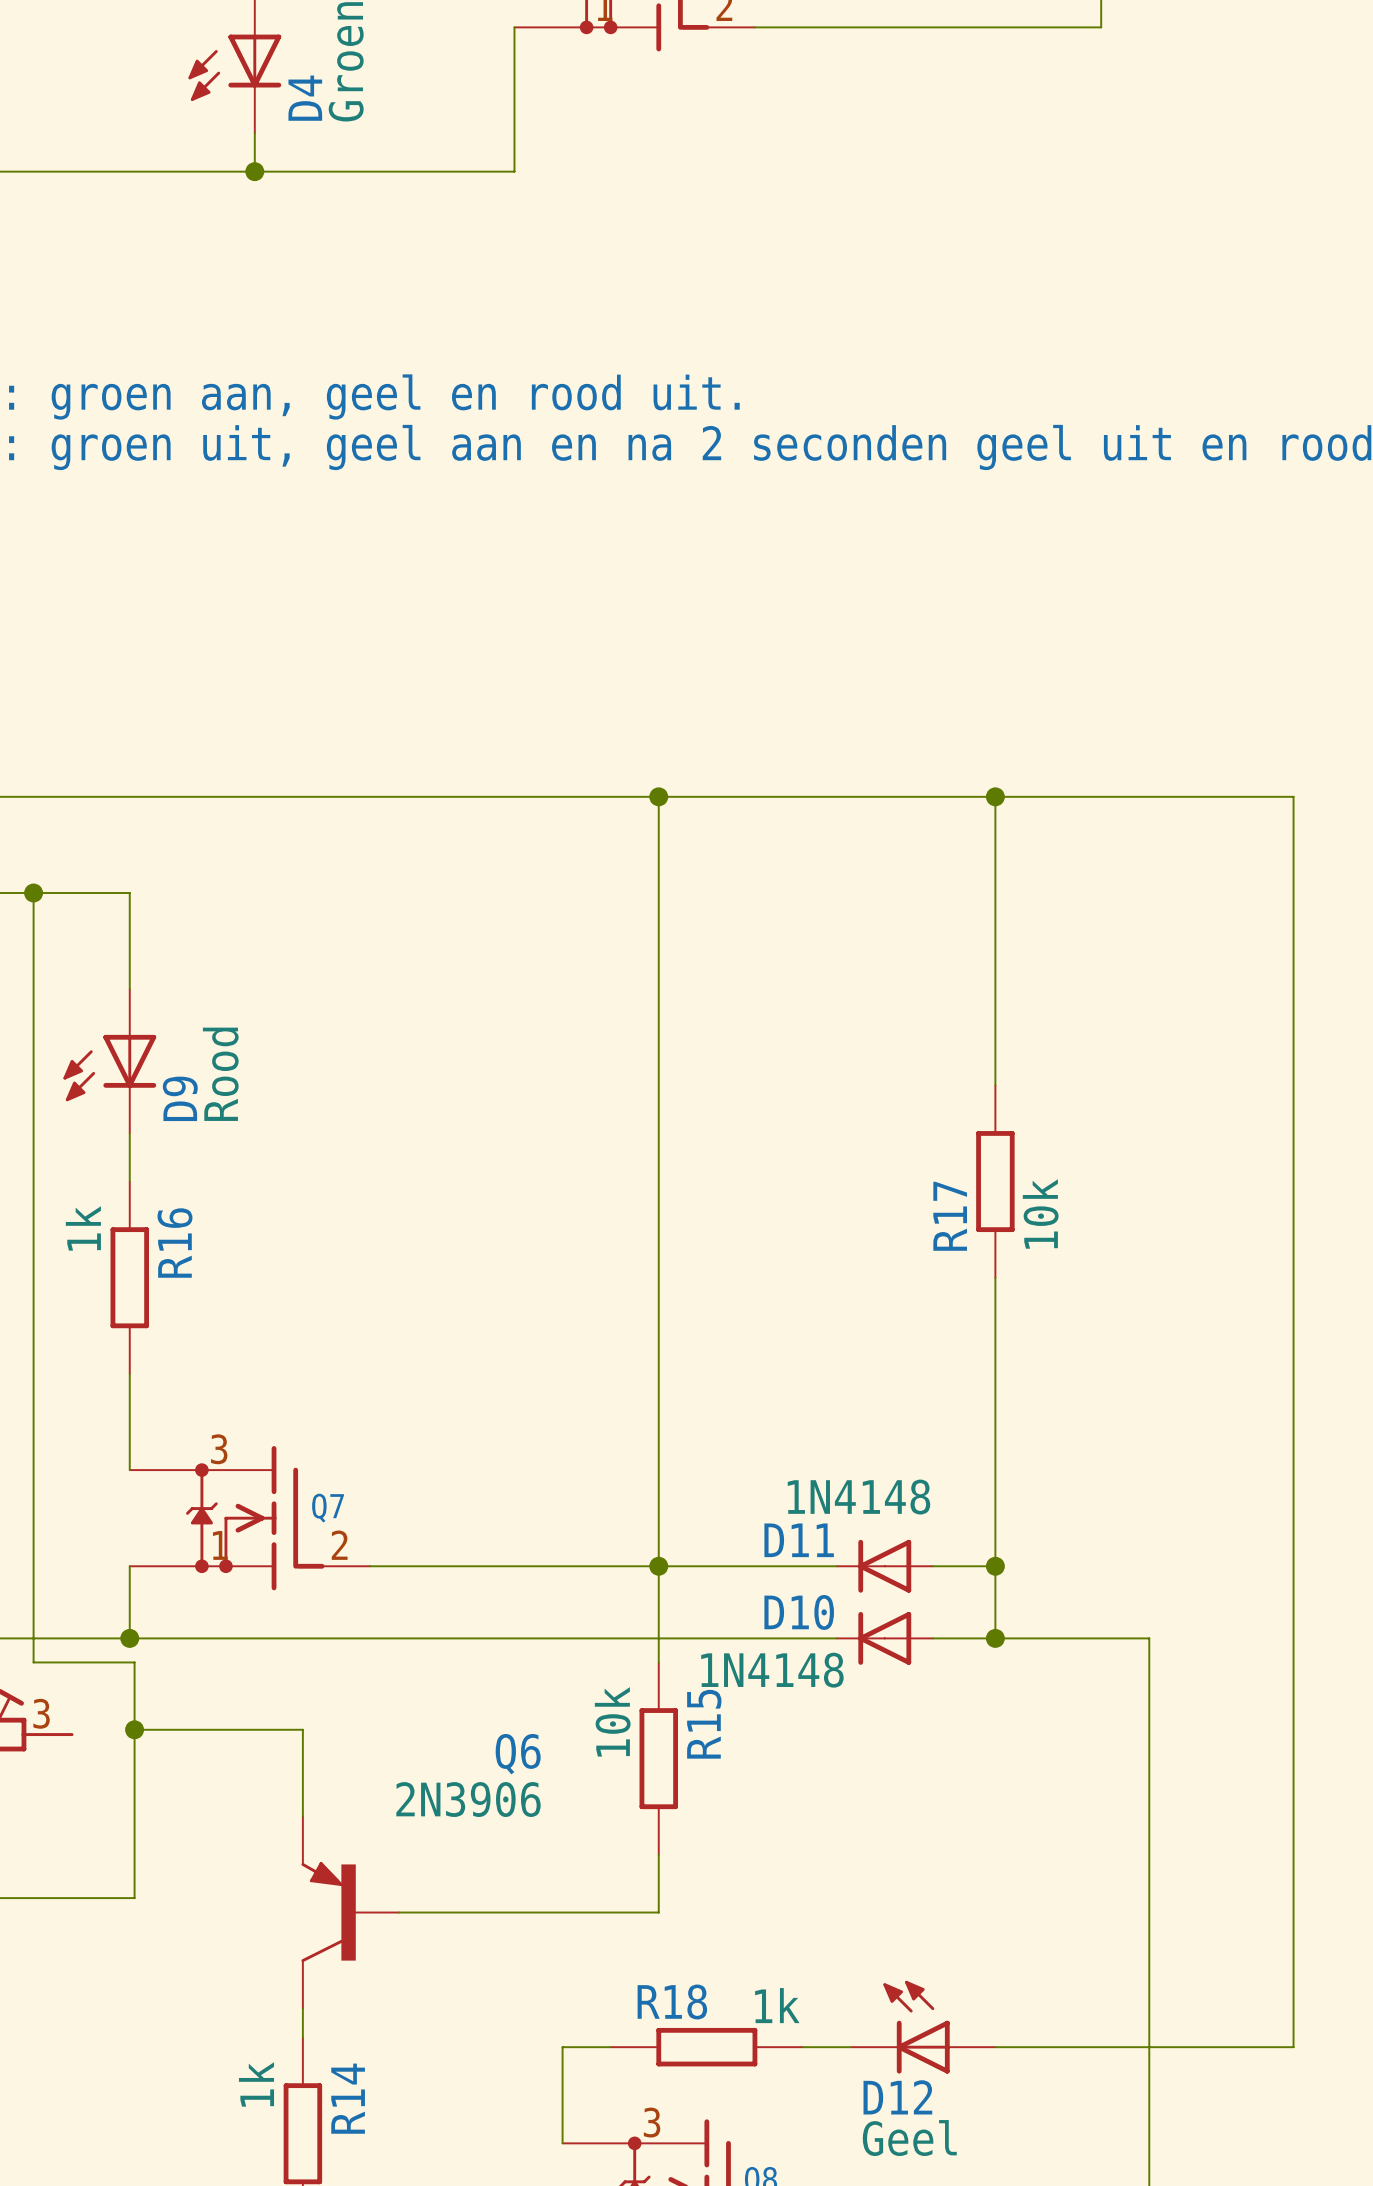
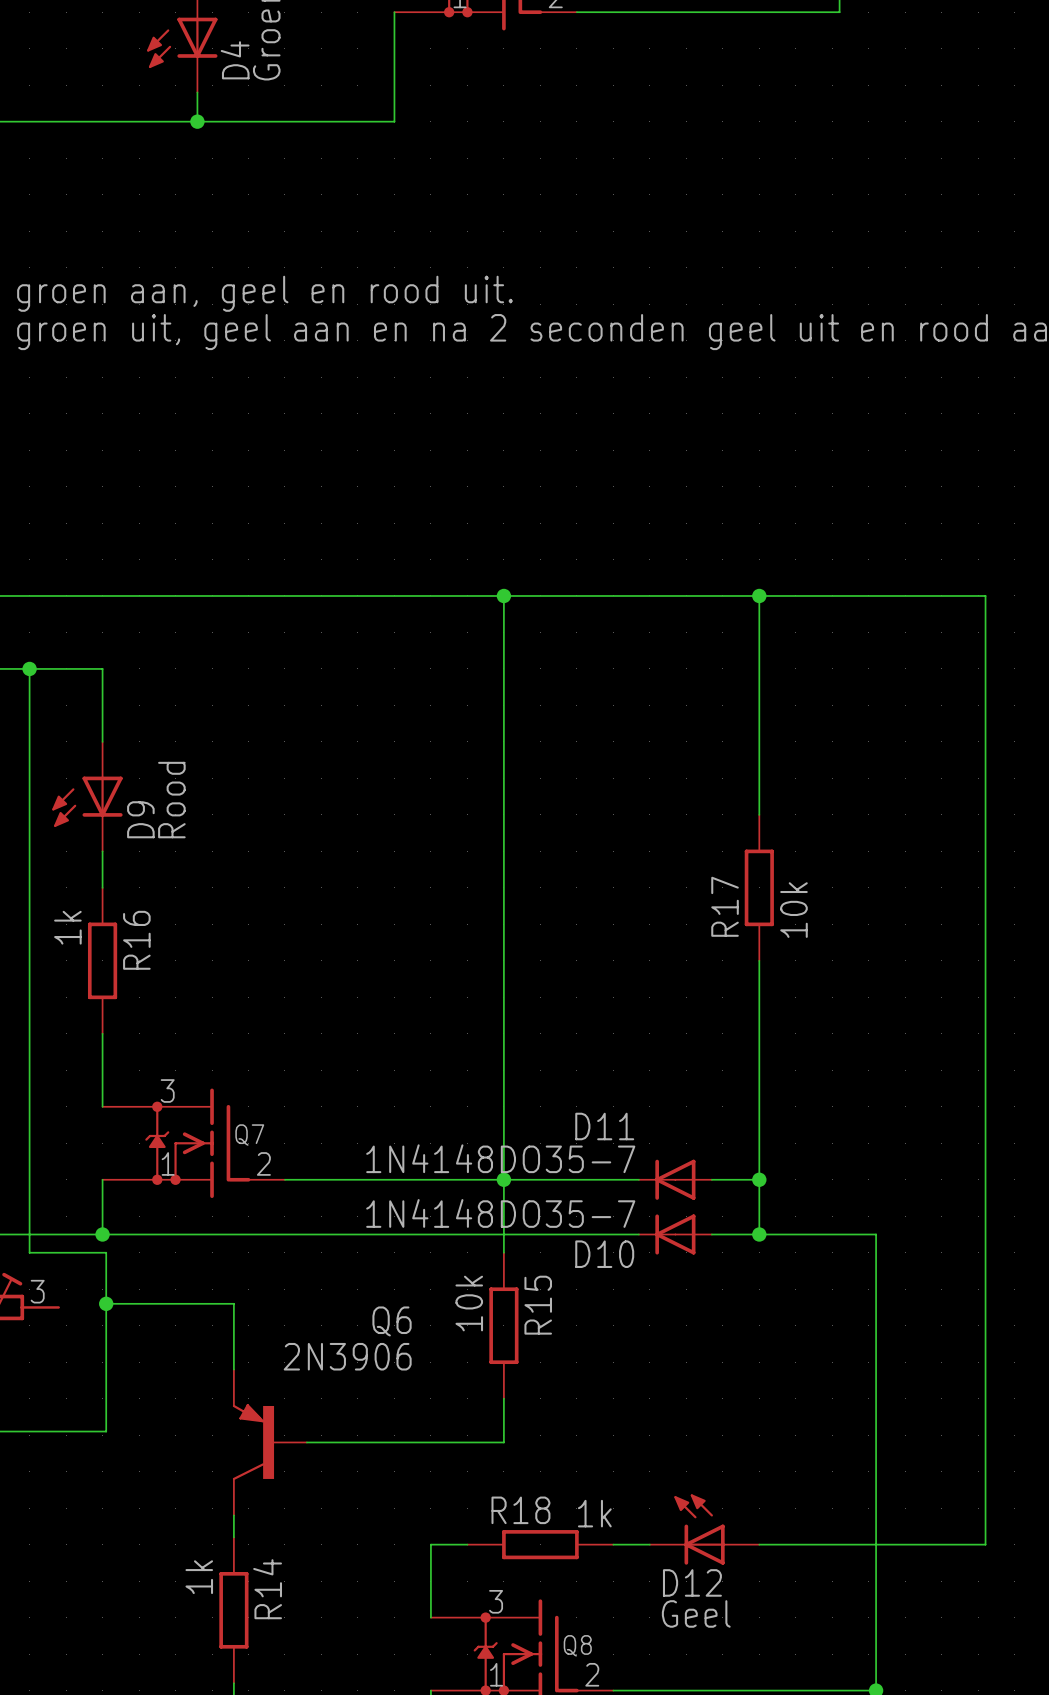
D11 value: 1N4148 (858, 1497) -> 1N4148DO35-7 (500, 1158)
D11 name position: D11 (799, 1540) -> D11 (604, 1126)
D10 name position: D10 (799, 1612) -> D10 (604, 1254)
D10 value: 1N4148 (772, 1670) -> 1N4148DO35-7 (500, 1213)

